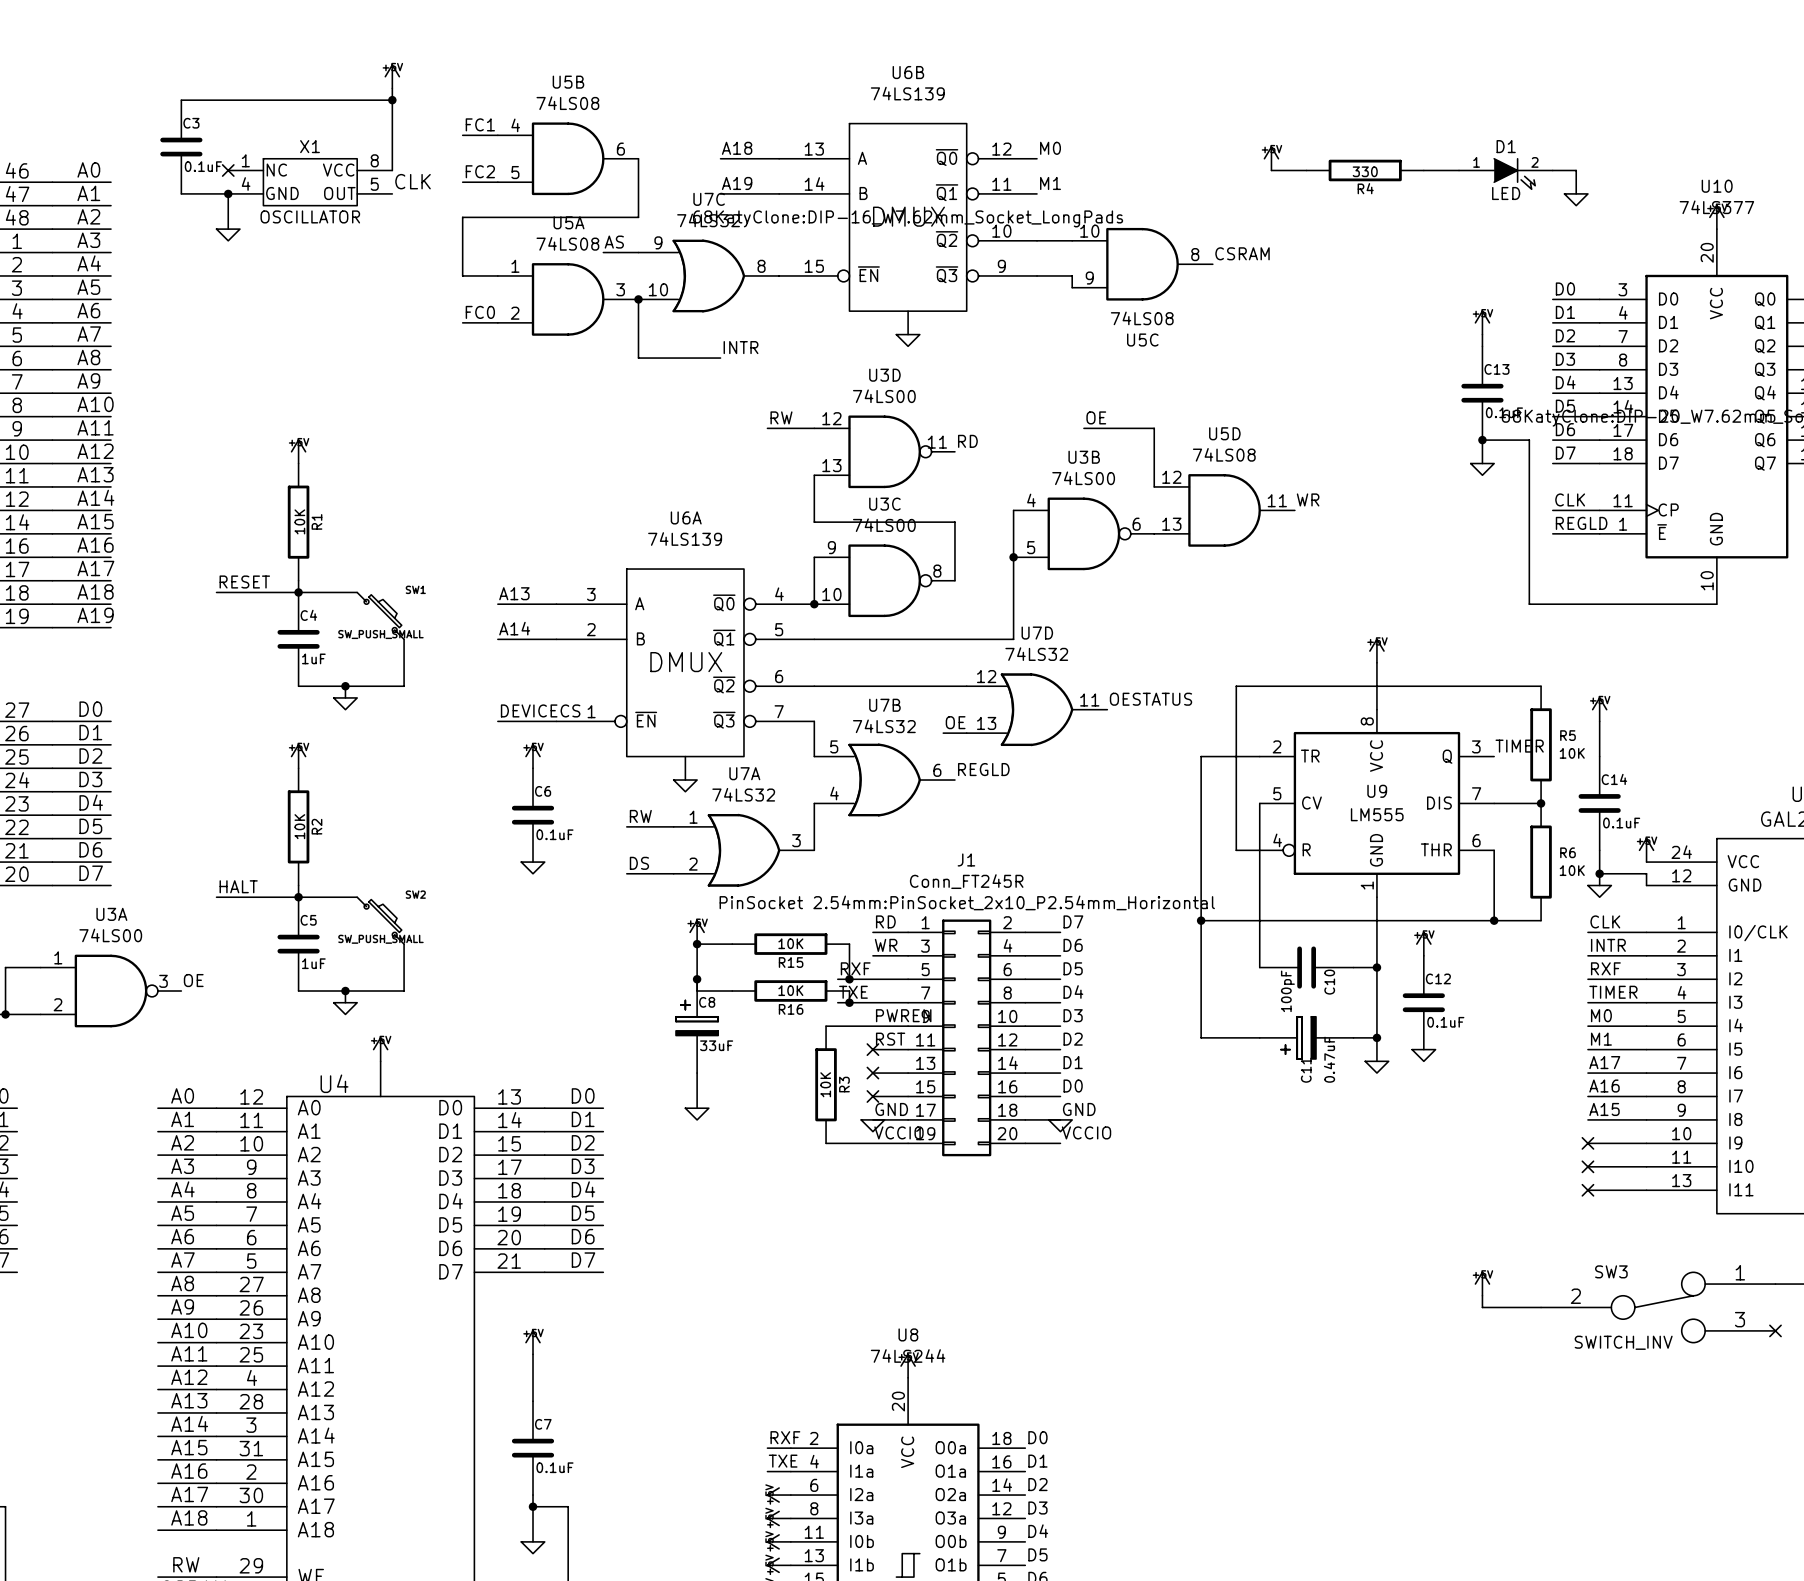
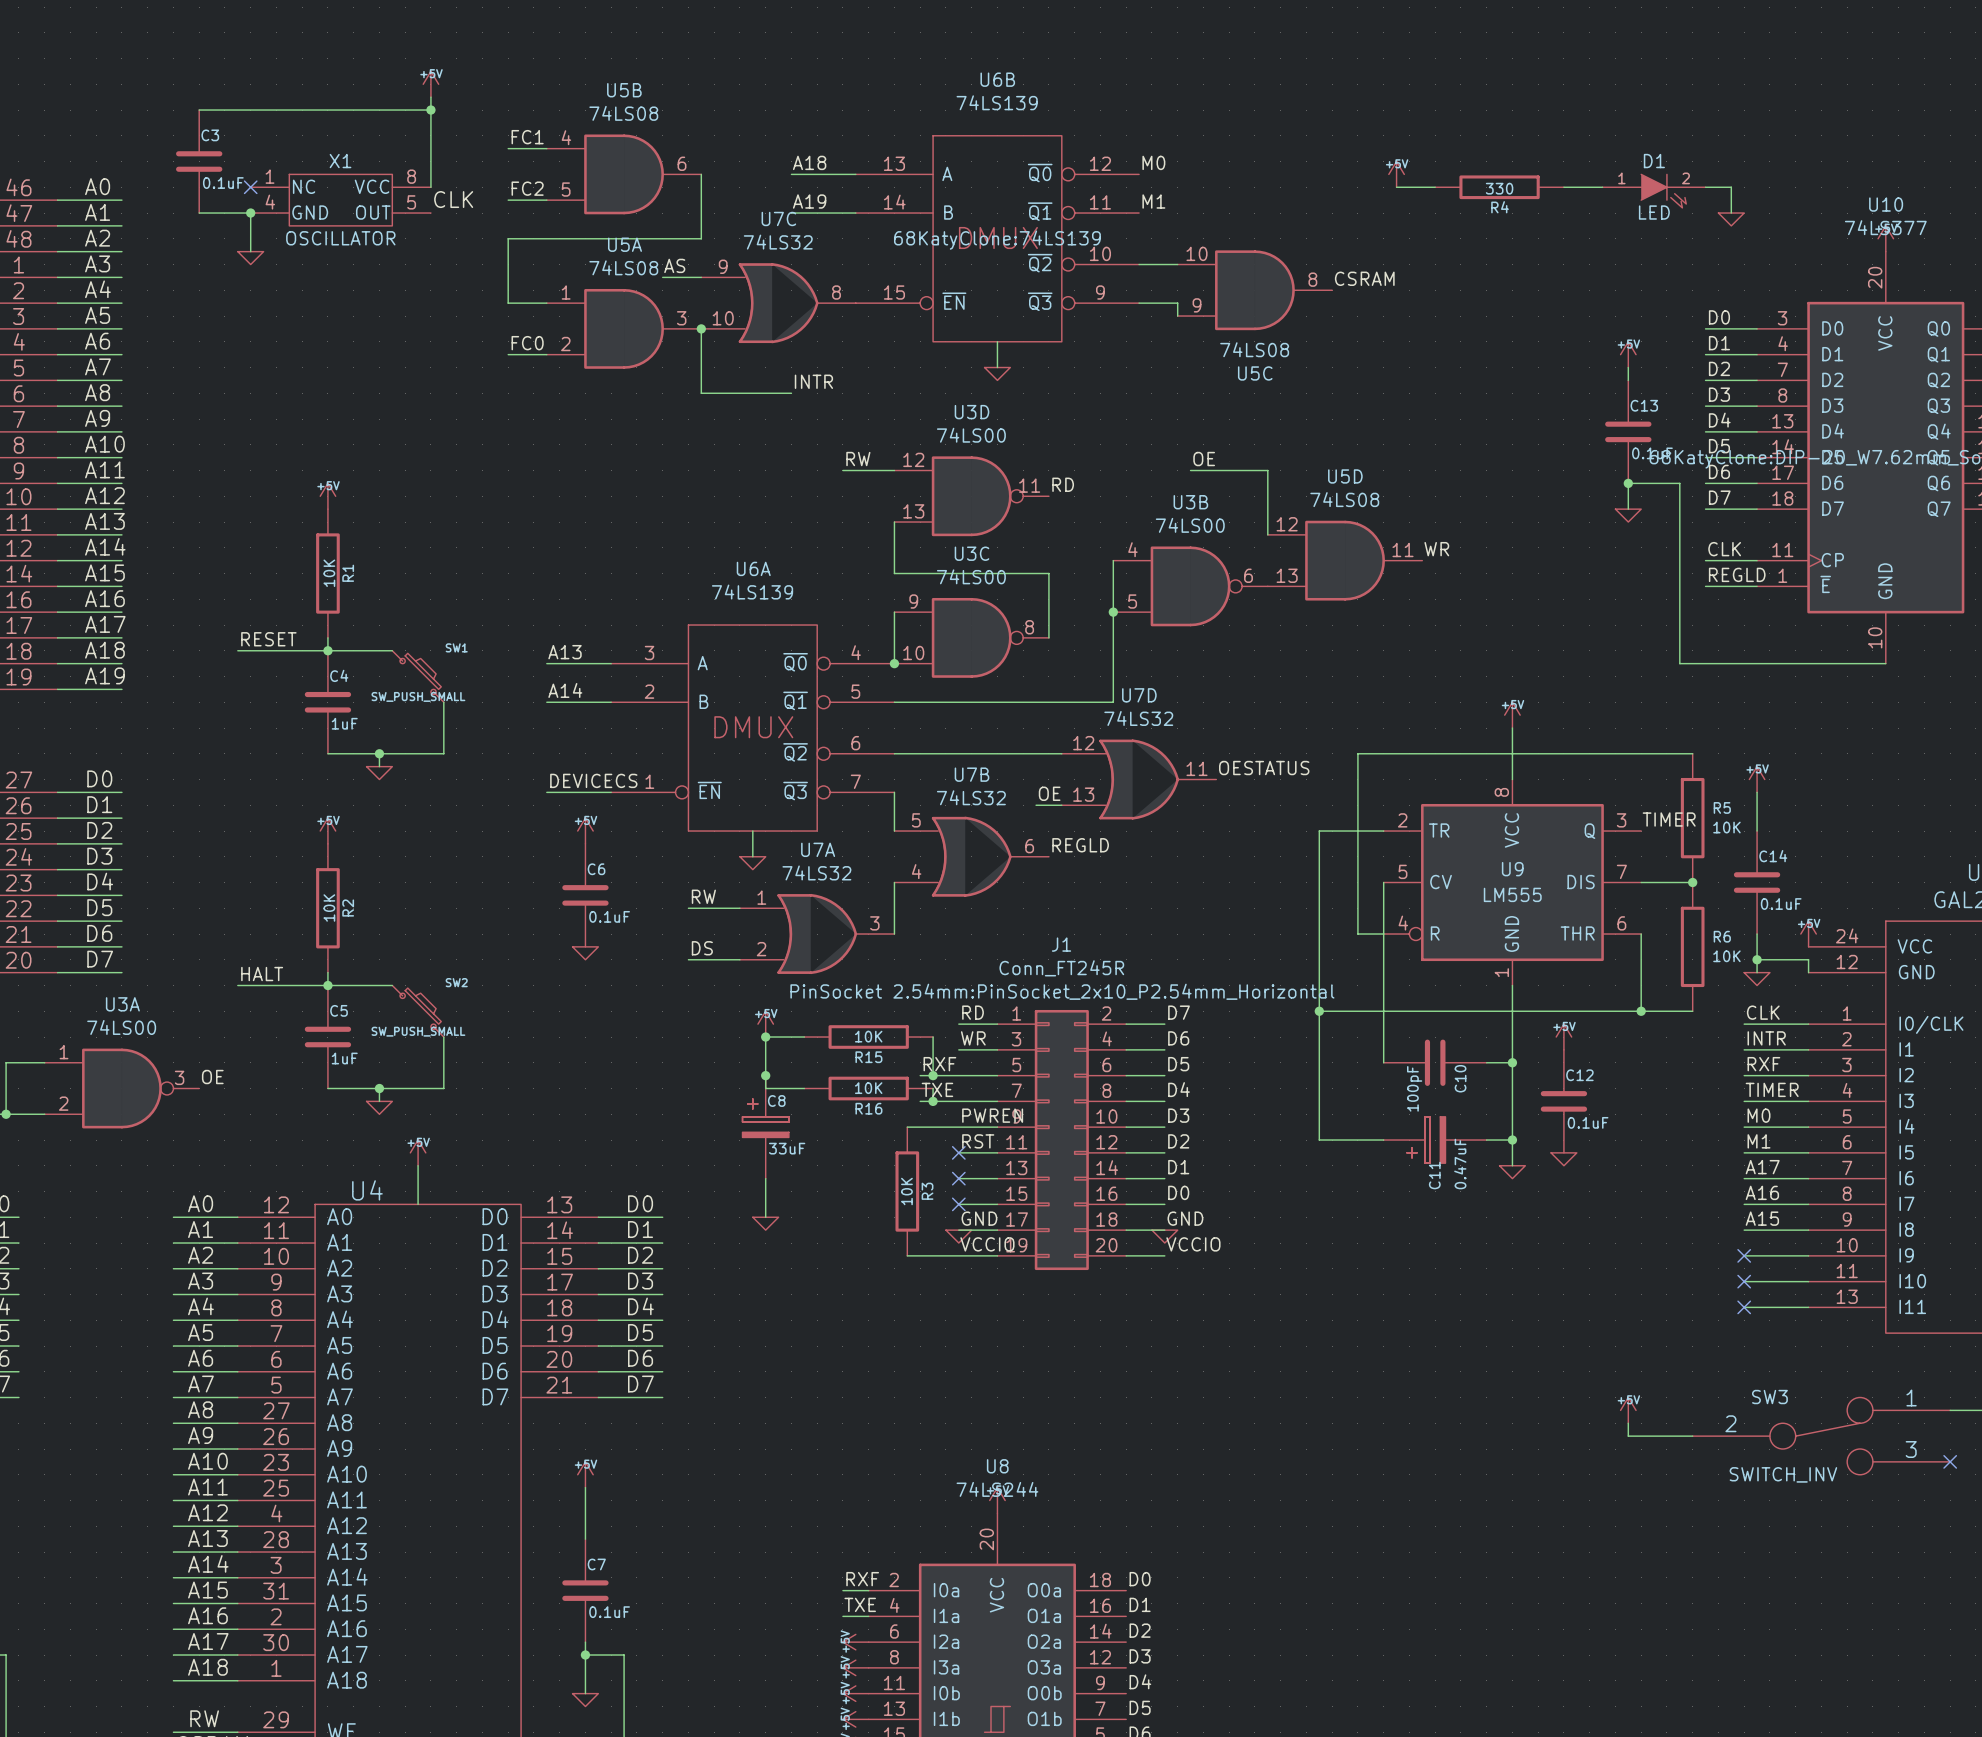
U6B text: 68KatyClone:DIP-16_W7.62mm_Socket_LongPads (908, 218) -> 68KatyClone:74LS139 (997, 240)

